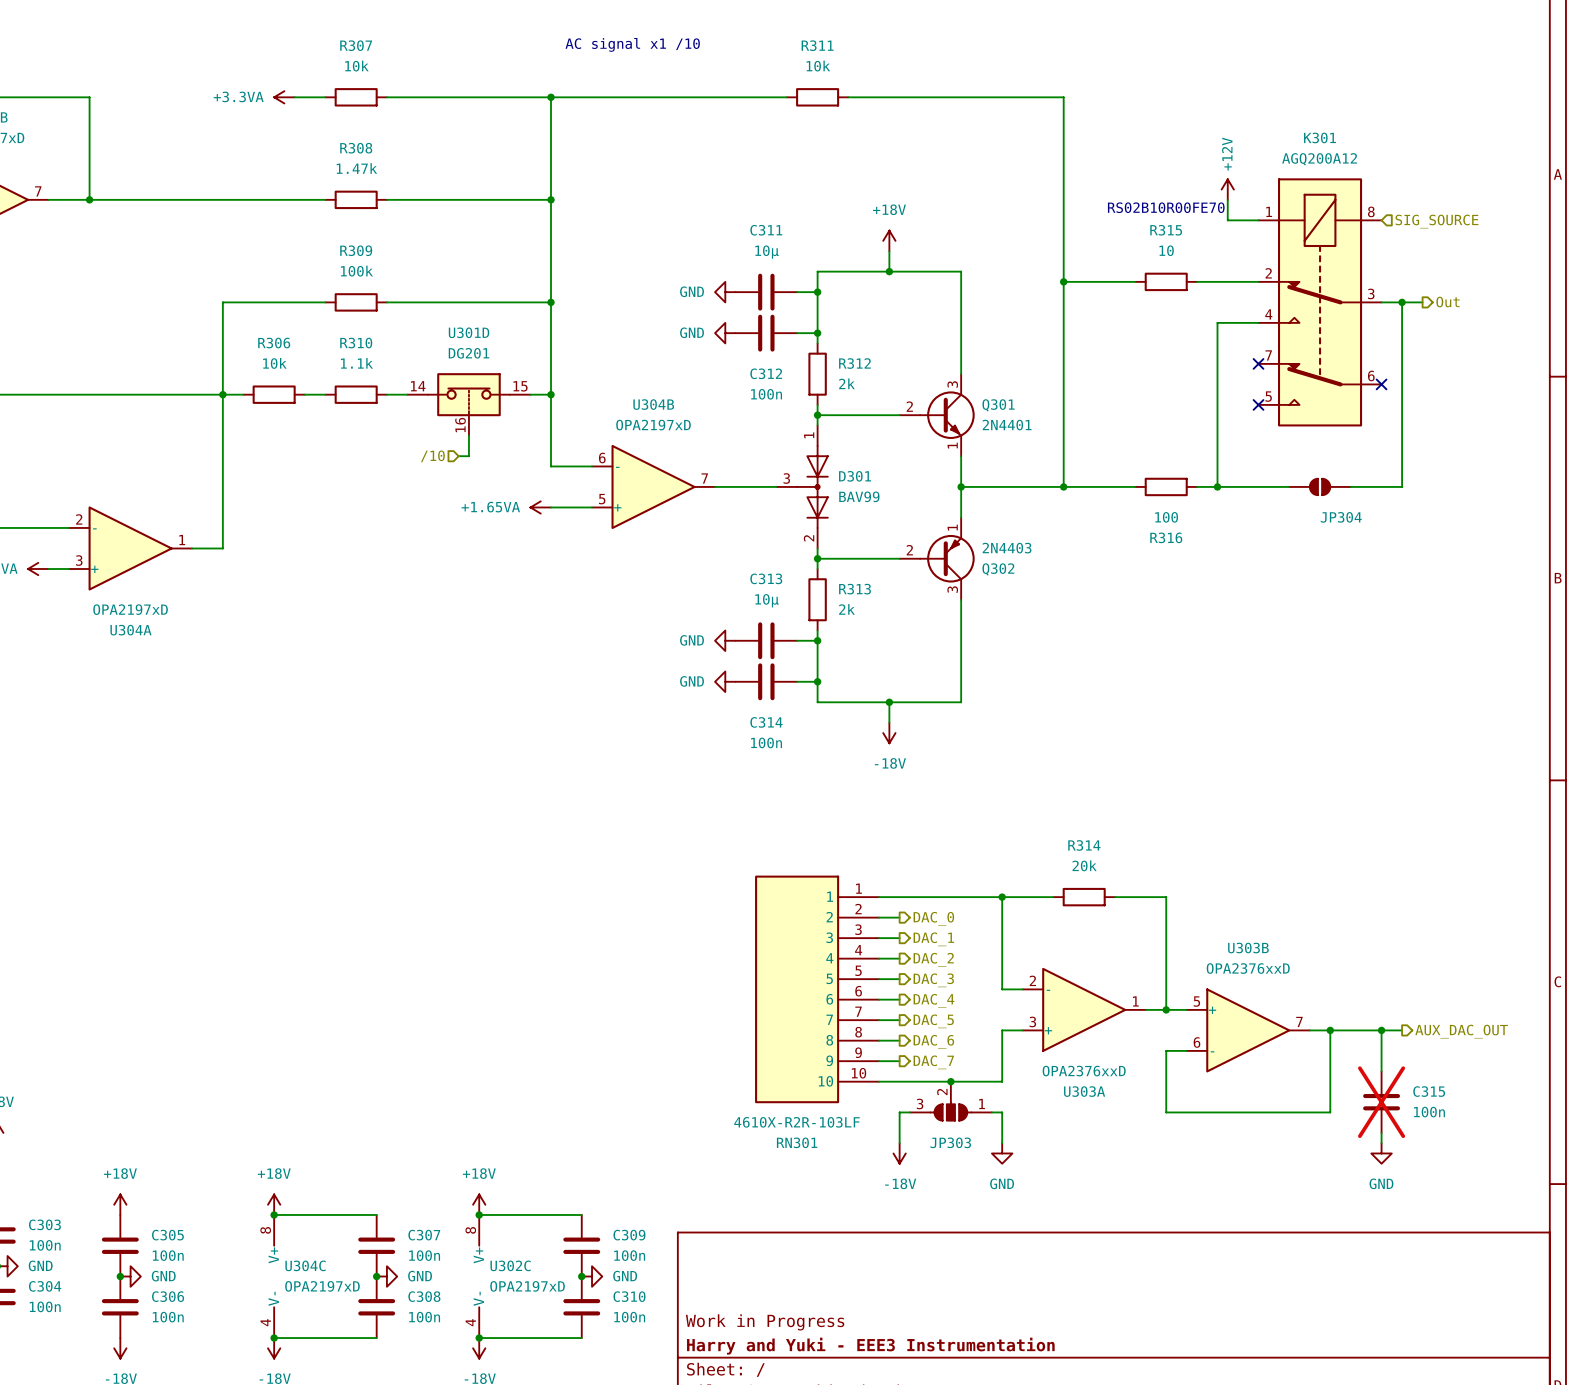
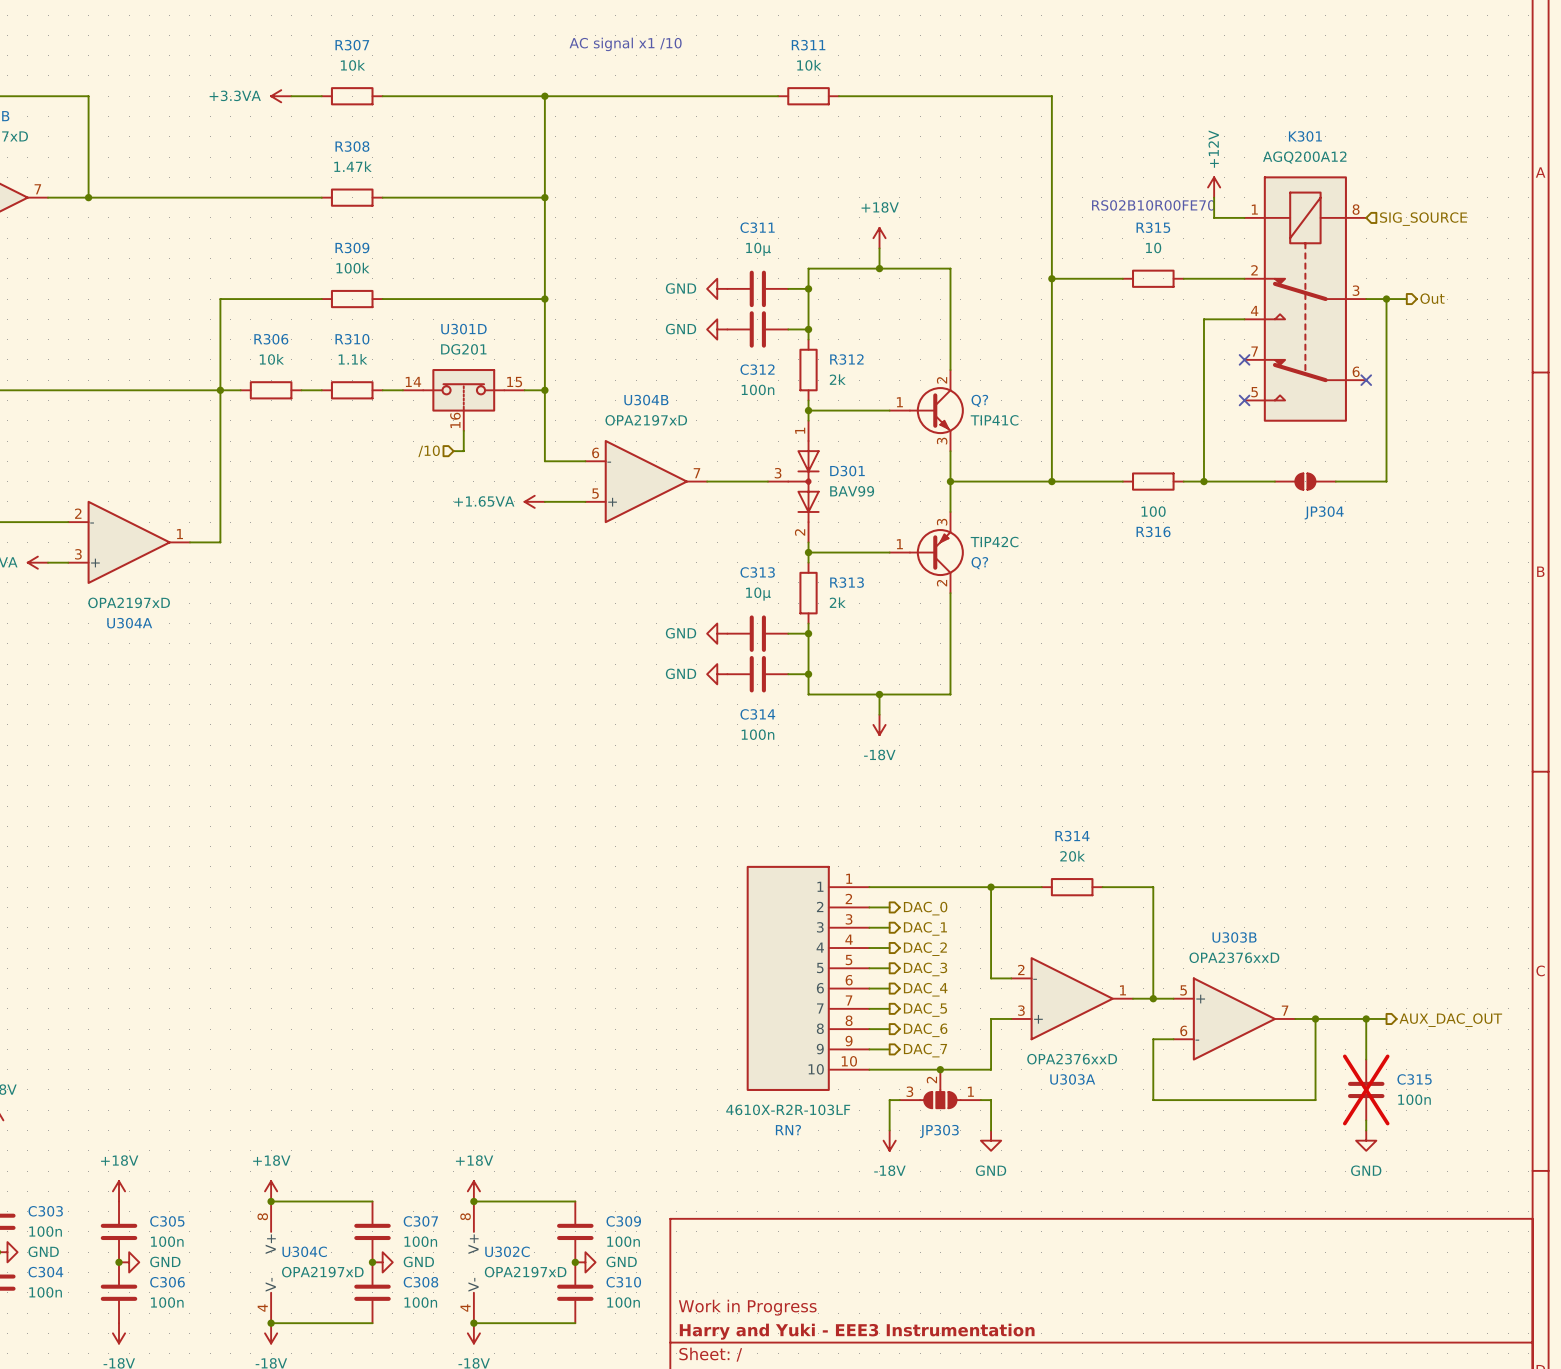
Q301 pin number: 3 (952, 384) -> 2 (942, 380)
Q301 name: Q301 (998, 405) -> Q? (979, 400)
Q301 pin number: 2 (909, 406) -> 1 (899, 402)
Q301 value: 2N4401 (1007, 425) -> TIP41C (994, 420)
Q301 pin number: 1 (952, 445) -> 3 (942, 441)
Q302 pin number: 1 (952, 527) -> 3 (942, 522)
Q302 value: 2N4403 (1007, 548) -> TIP42C (994, 542)
Q302 pin number: 2 (909, 550) -> 1 (899, 544)
Q302 name: Q302 (998, 569) -> Q? (979, 563)
Q302 pin number: 3 (952, 589) -> 2 (942, 583)
RN301 name: RN301 (797, 1142) -> RN? (788, 1130)

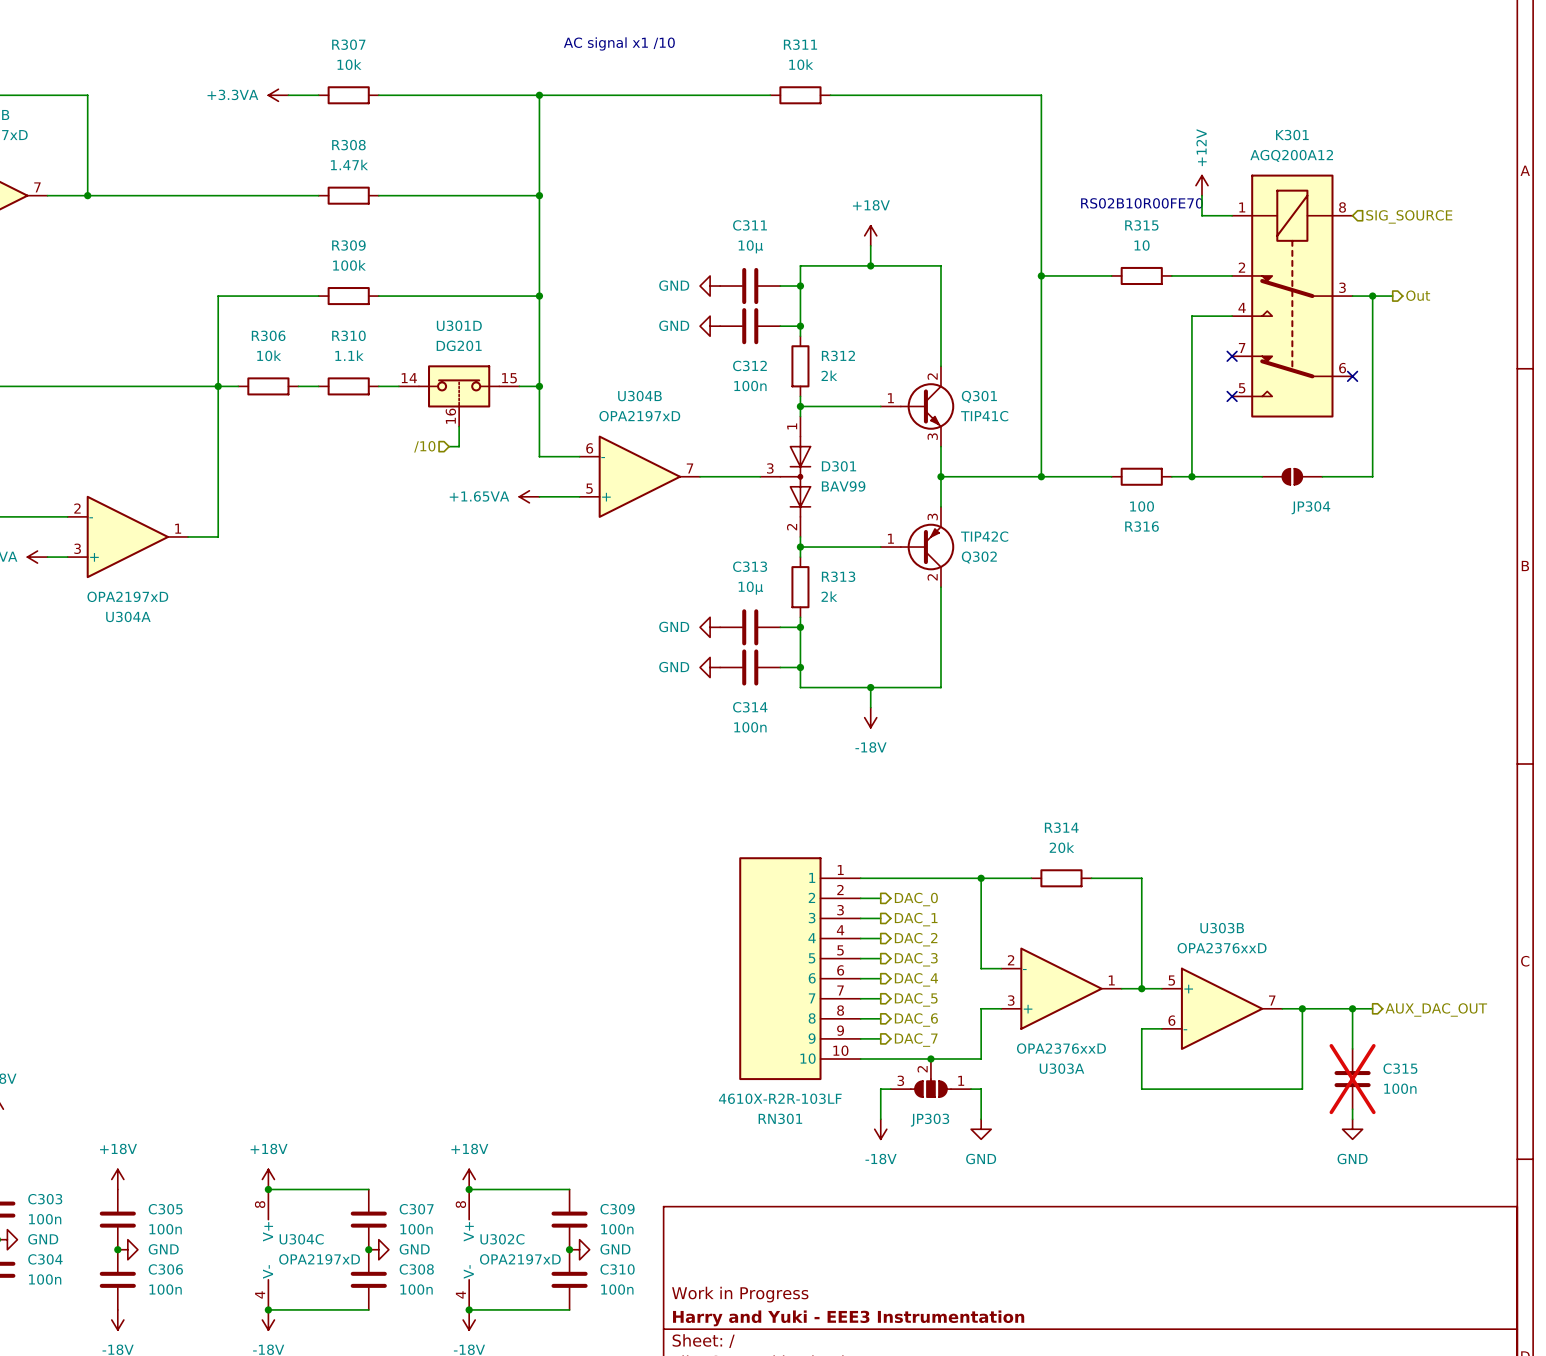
Q? name: Q? (979, 400) -> Q301 (979, 396)
Q? name: Q? (979, 563) -> Q302 (979, 557)
RN? name: RN? (788, 1130) -> RN301 (780, 1118)

